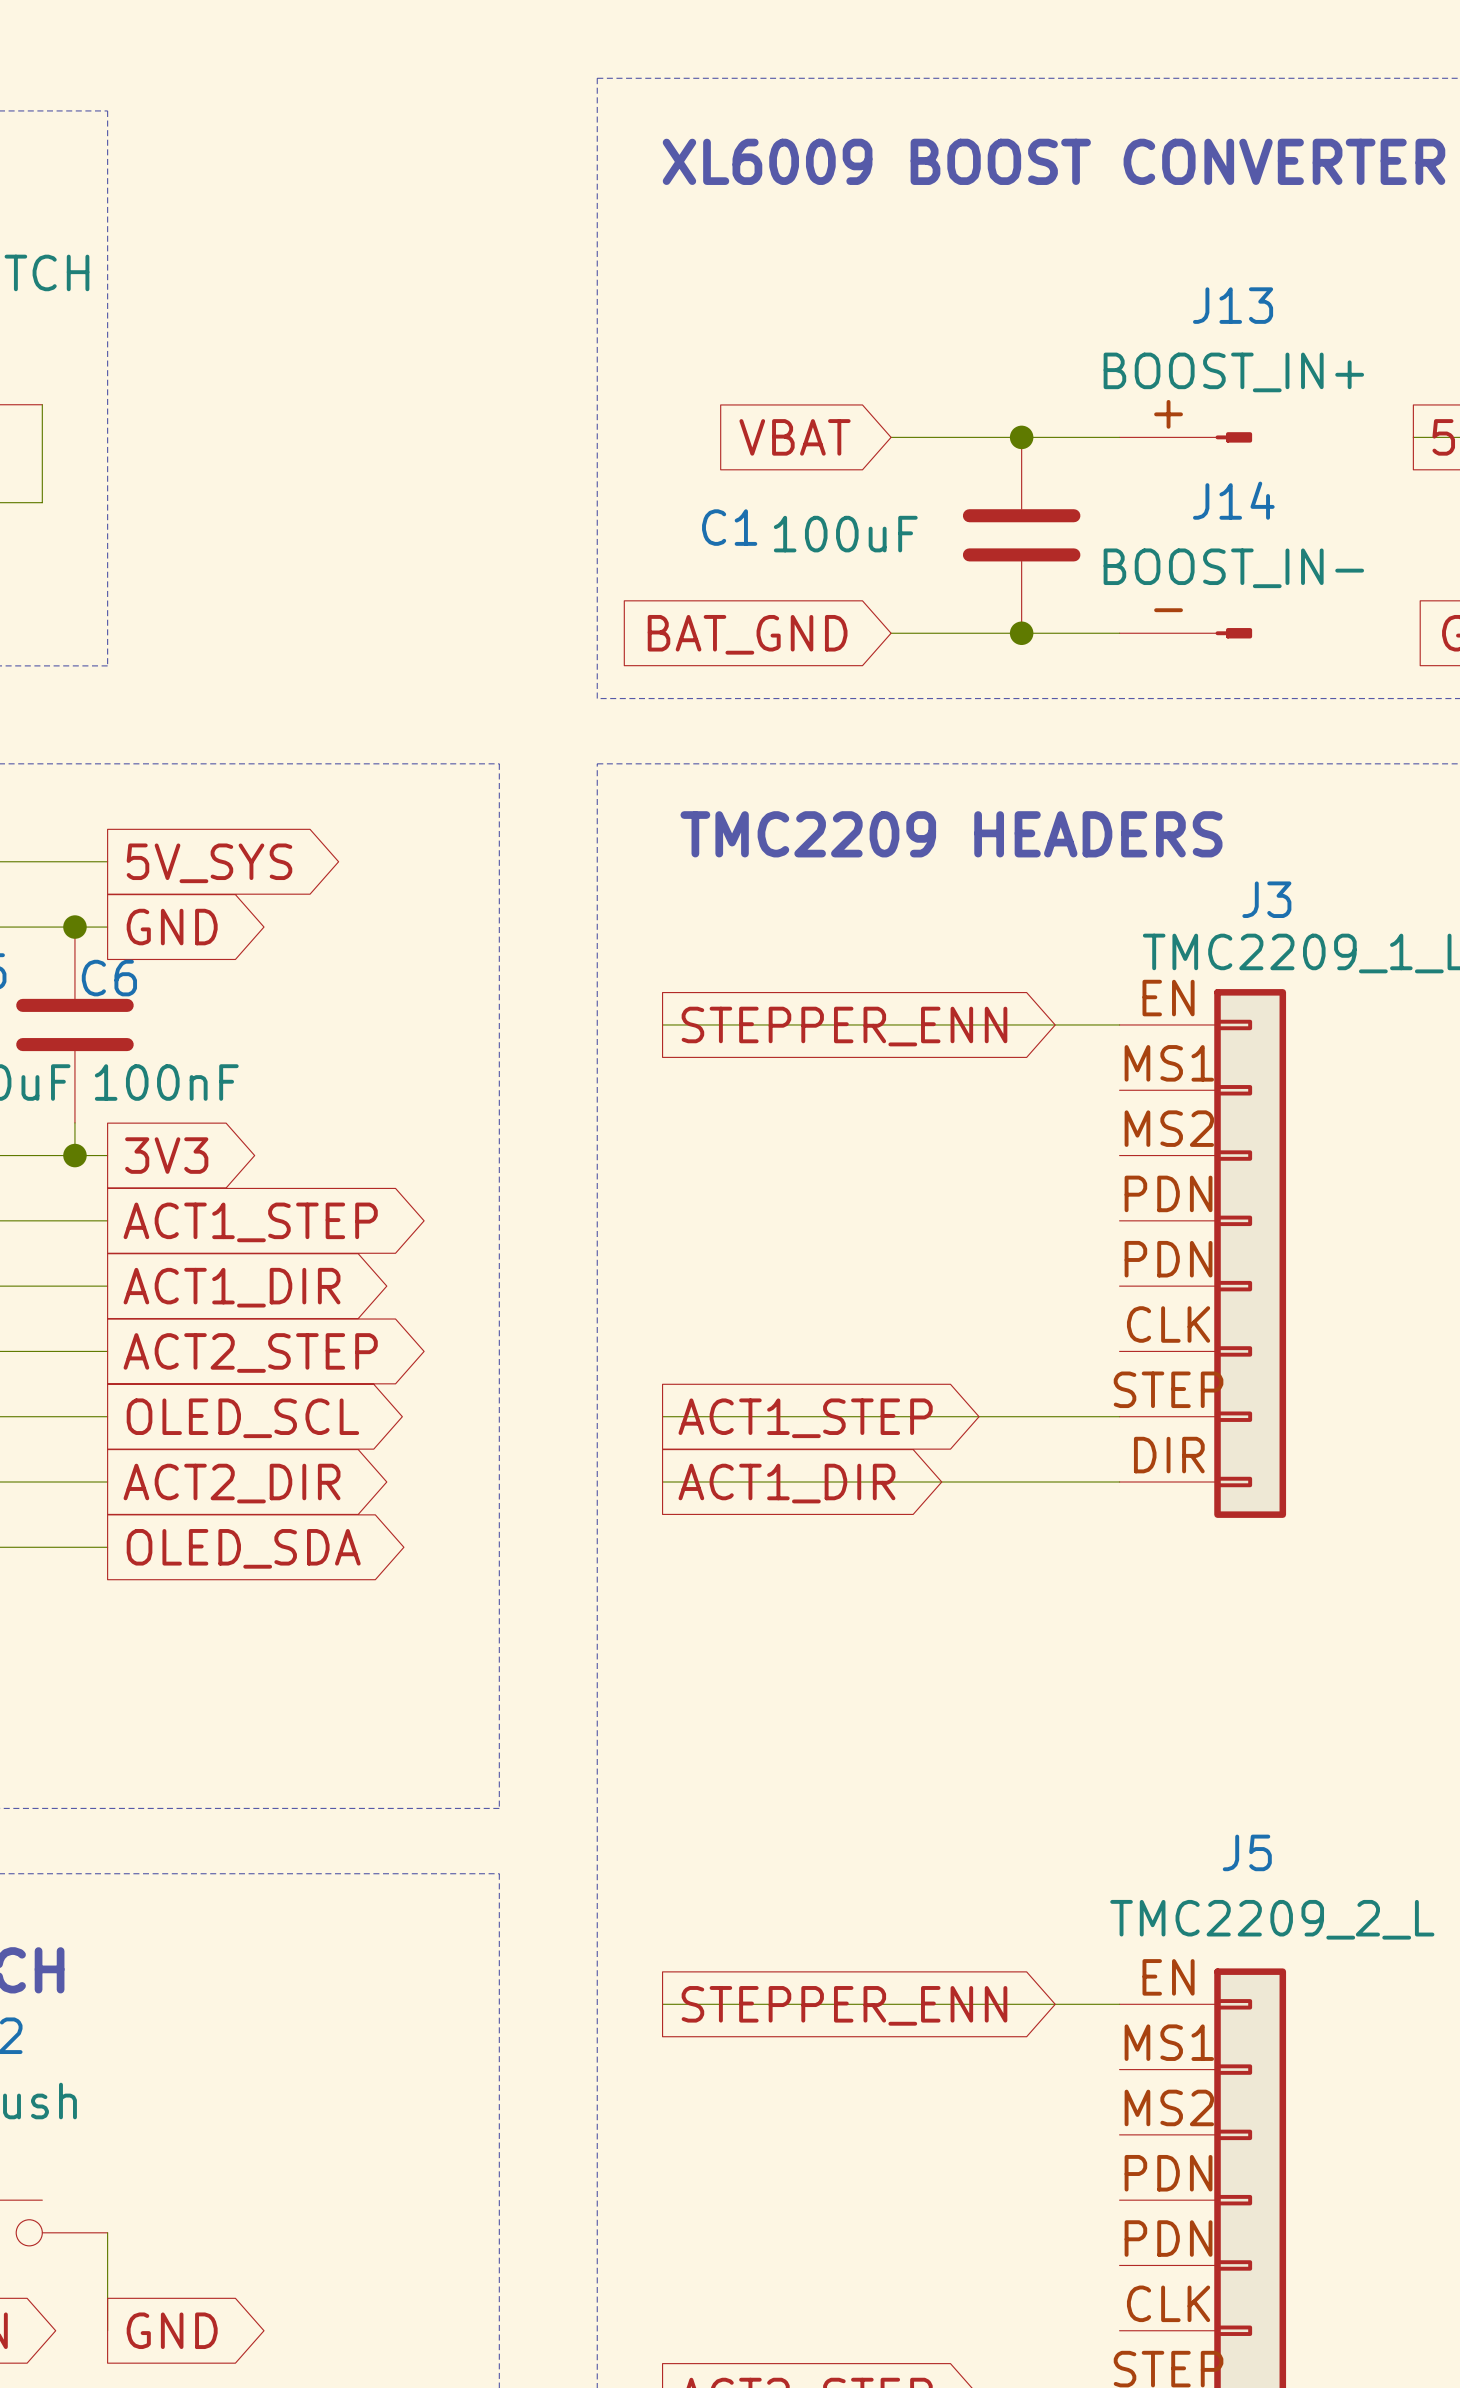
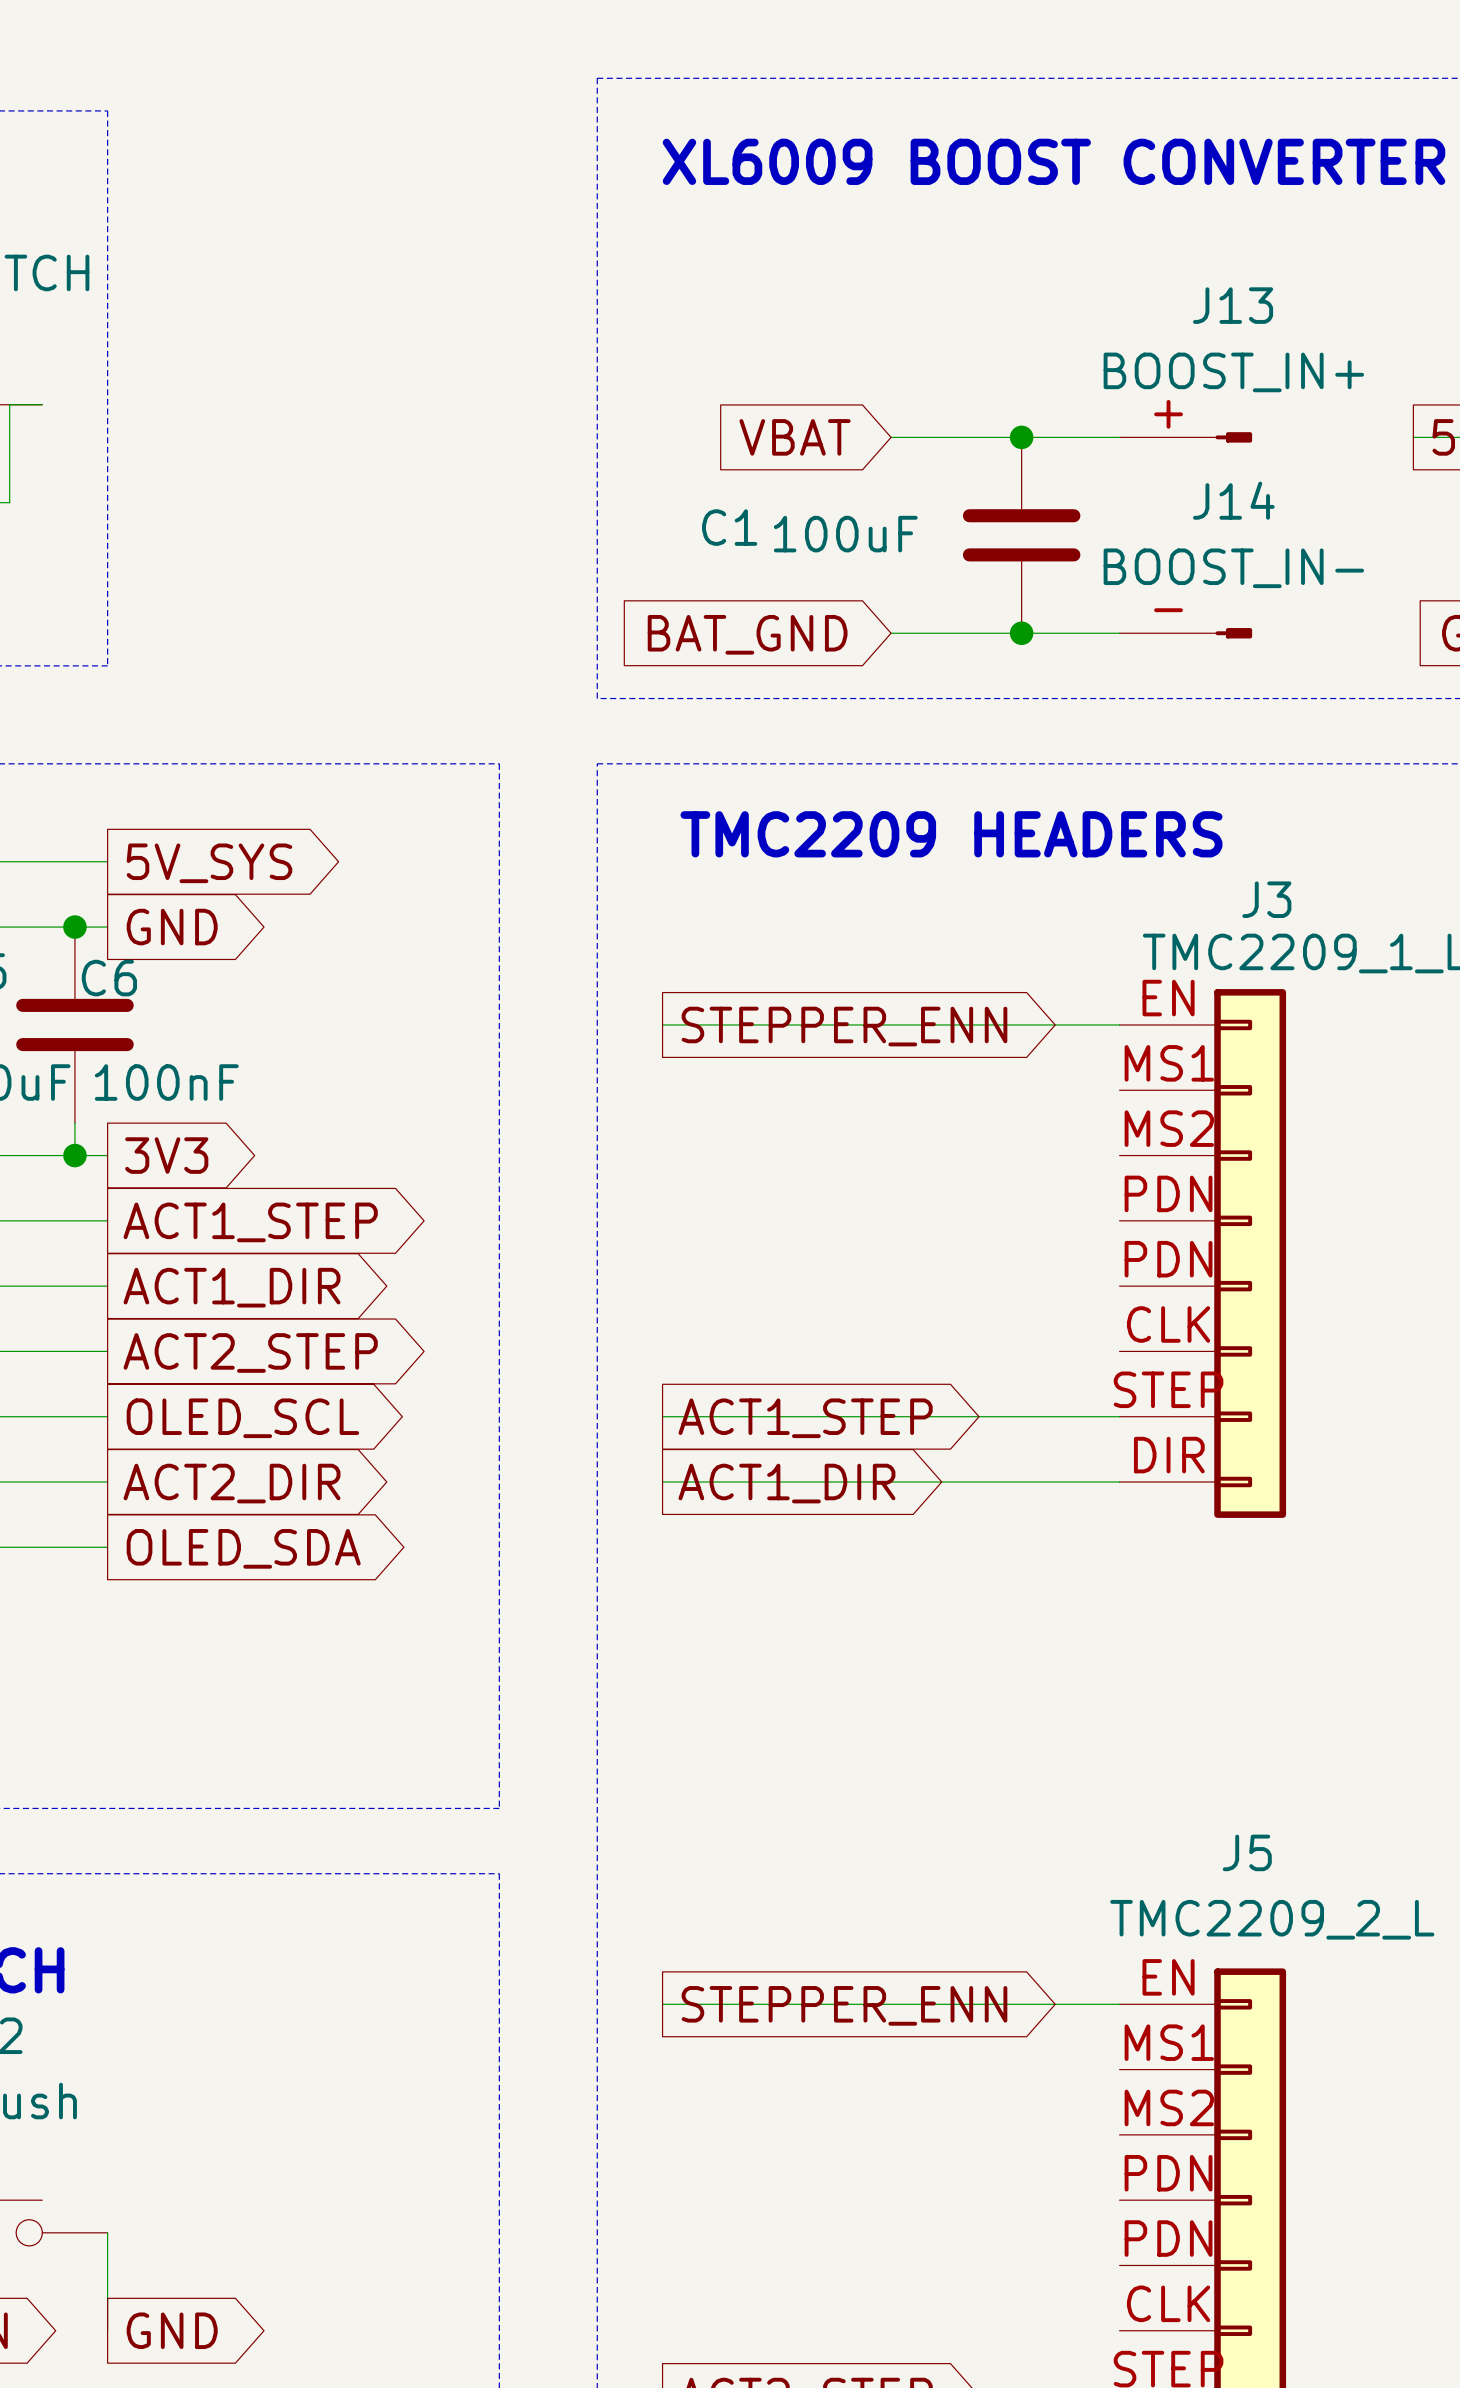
wire: (42, 404) (42, 502) (9, 502) -> (42, 404) (9, 404) (9, 502)

